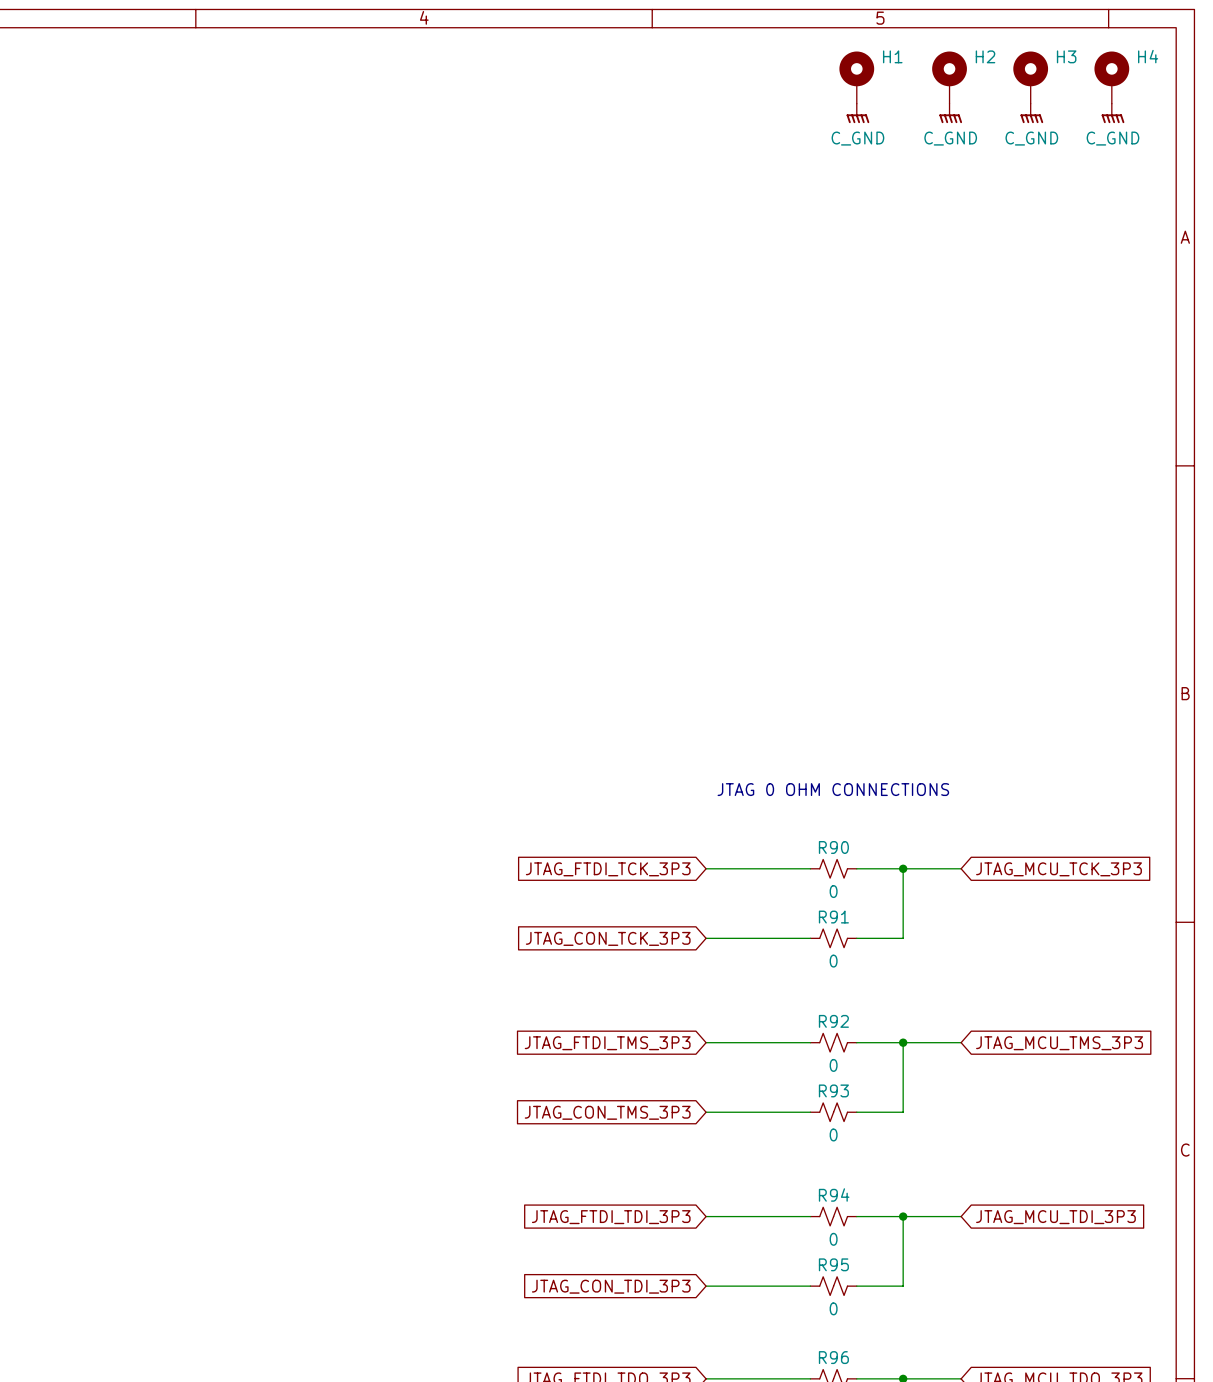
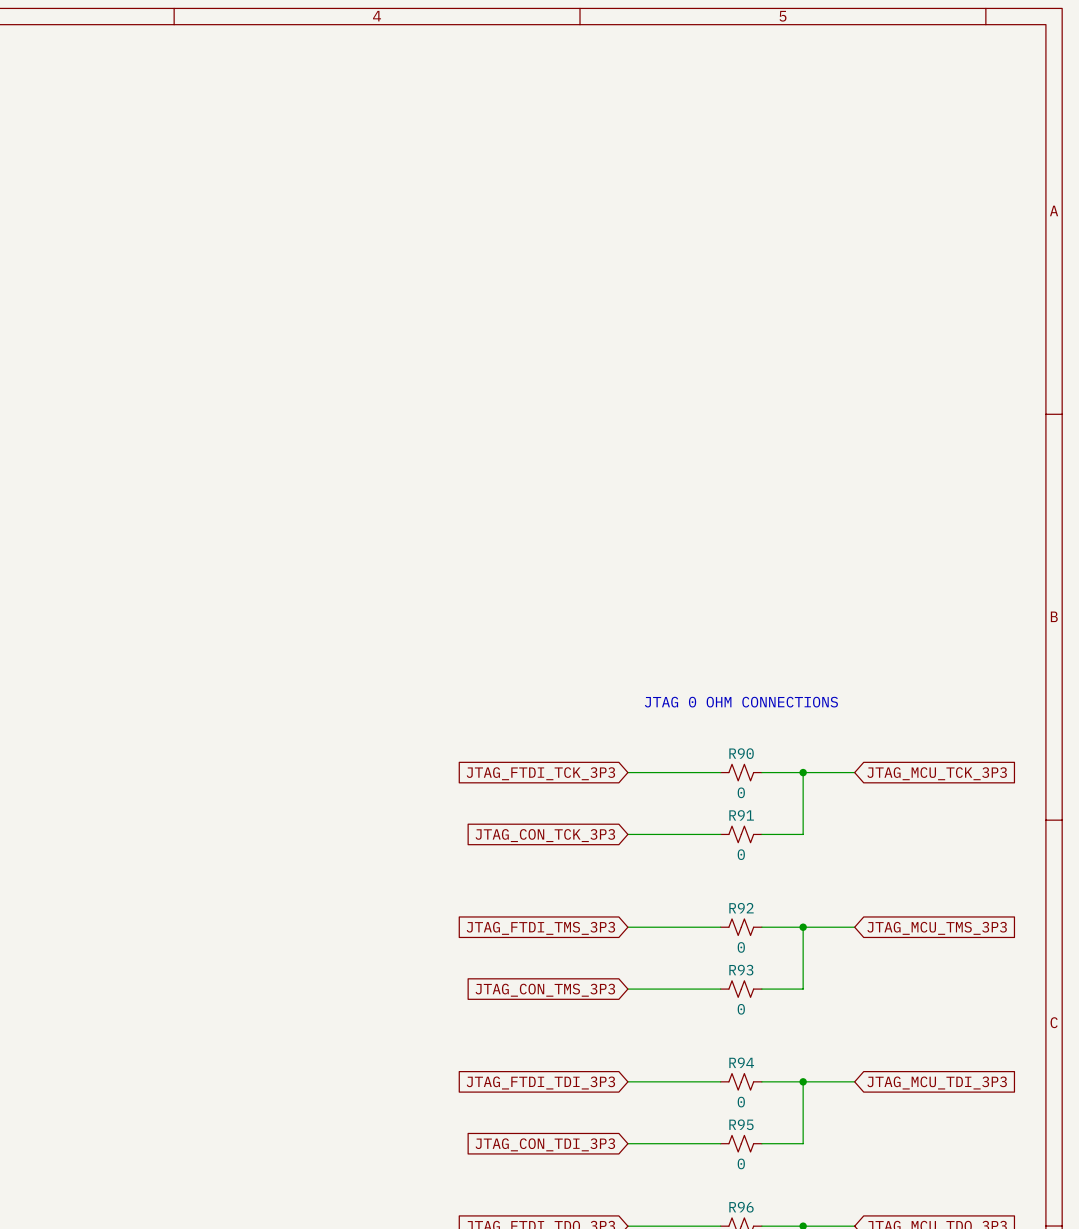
H1: (856, 77) -> none
H2: (949, 77) -> none
H3: (1030, 77) -> none
H4: (1111, 77) -> none
power symbol: C_GND (857, 113) -> none
power symbol: C_GND (950, 113) -> none
power symbol: C_GND (1031, 113) -> none
power symbol: C_GND (1112, 113) -> none

